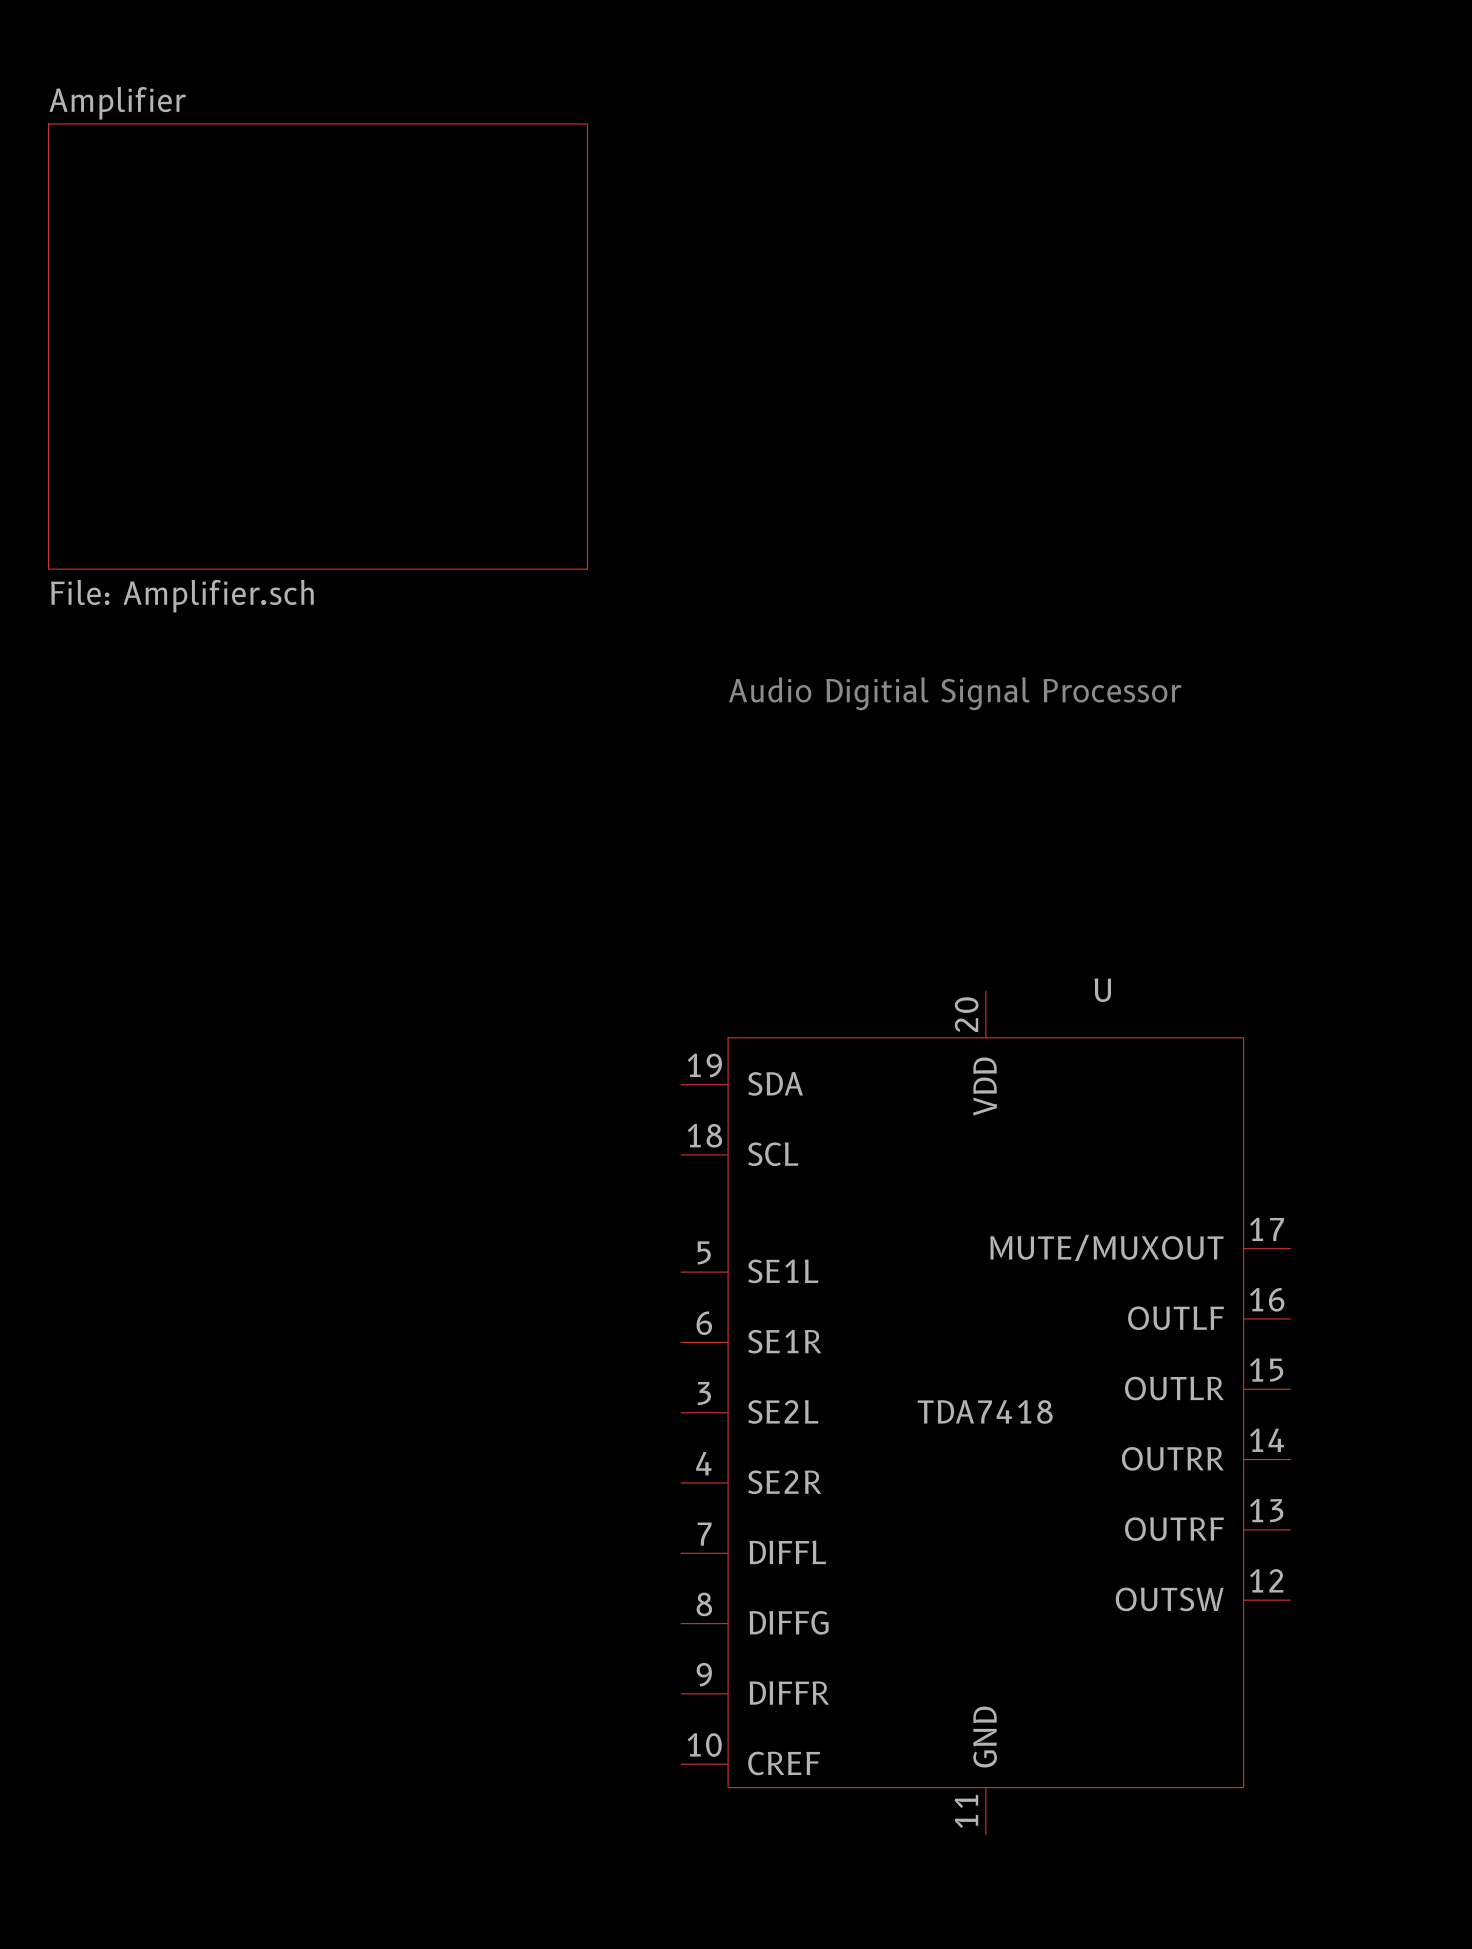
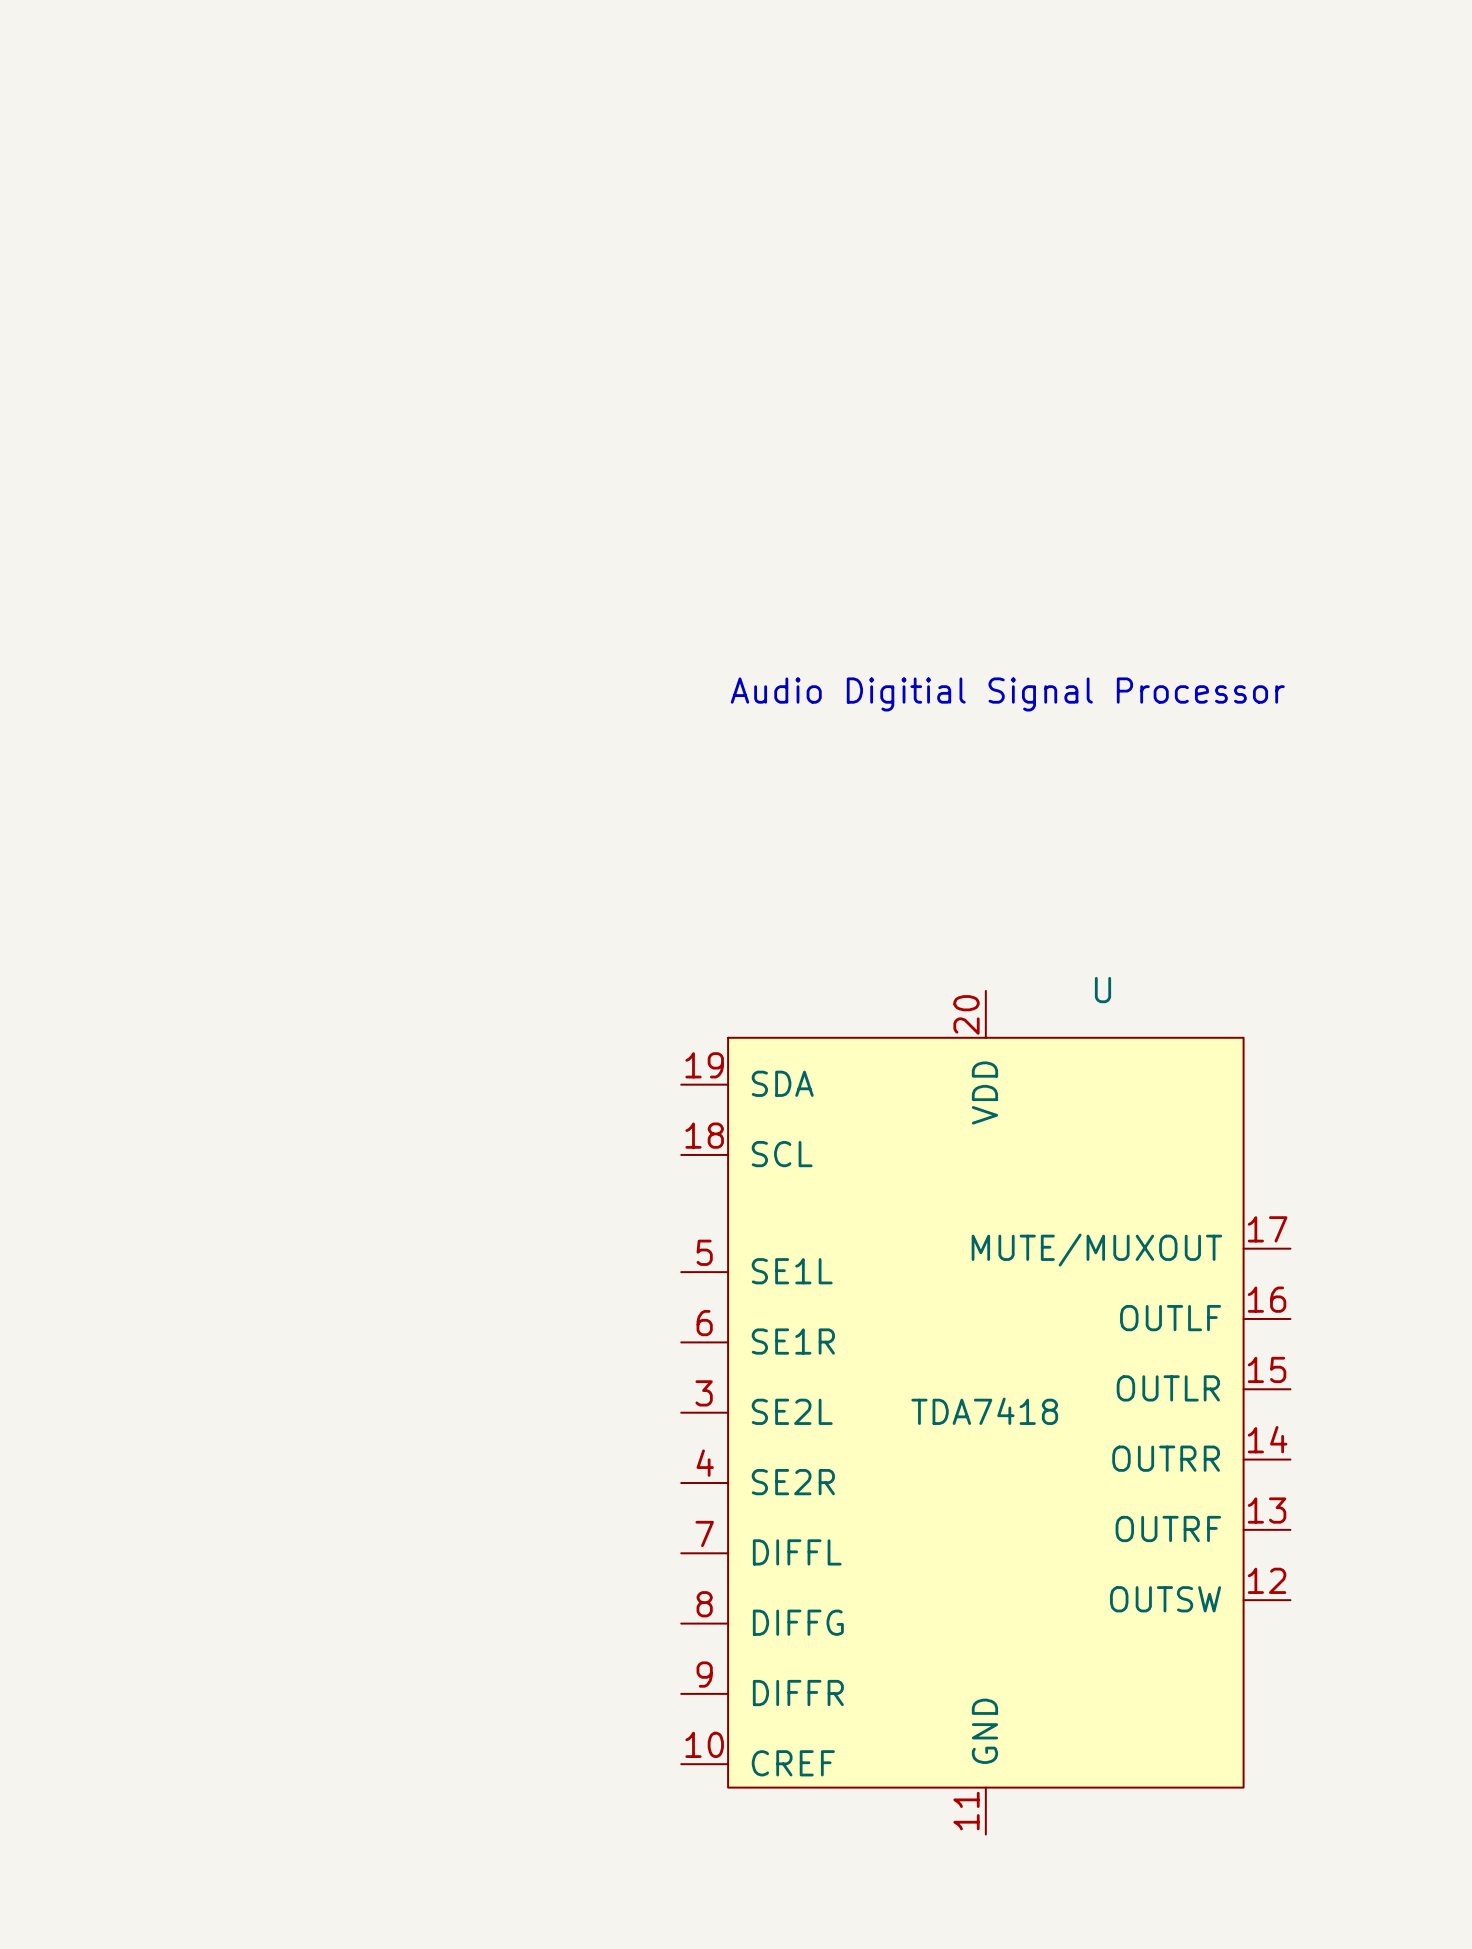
sheet Amplifier: File: Amplifier.sch (318, 346) -> none

